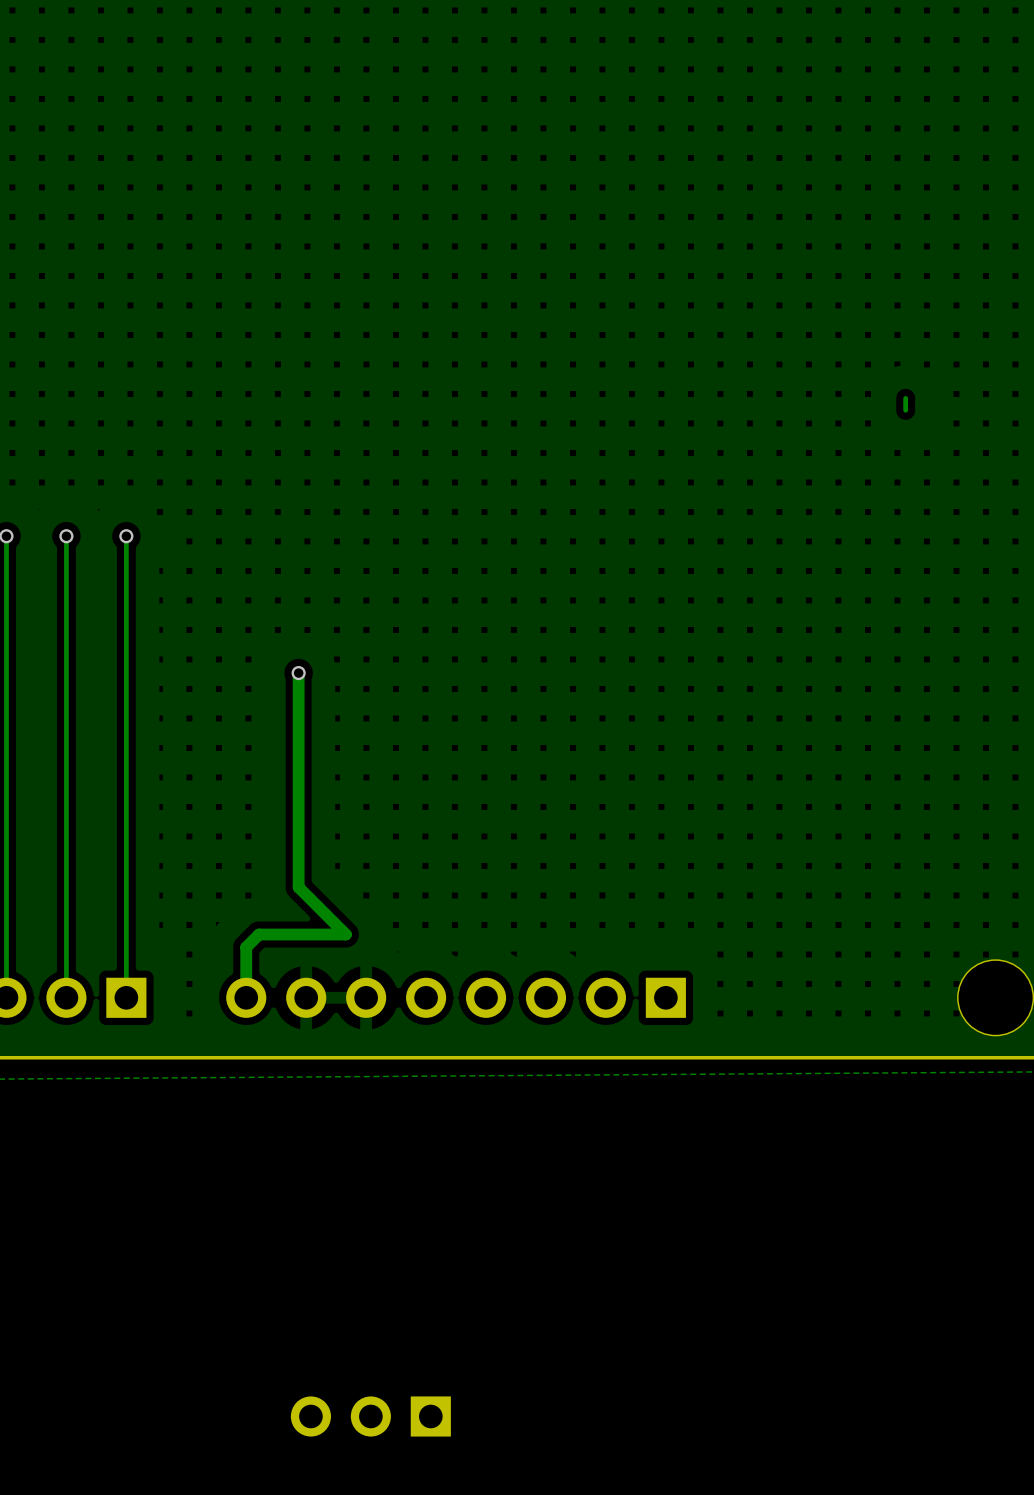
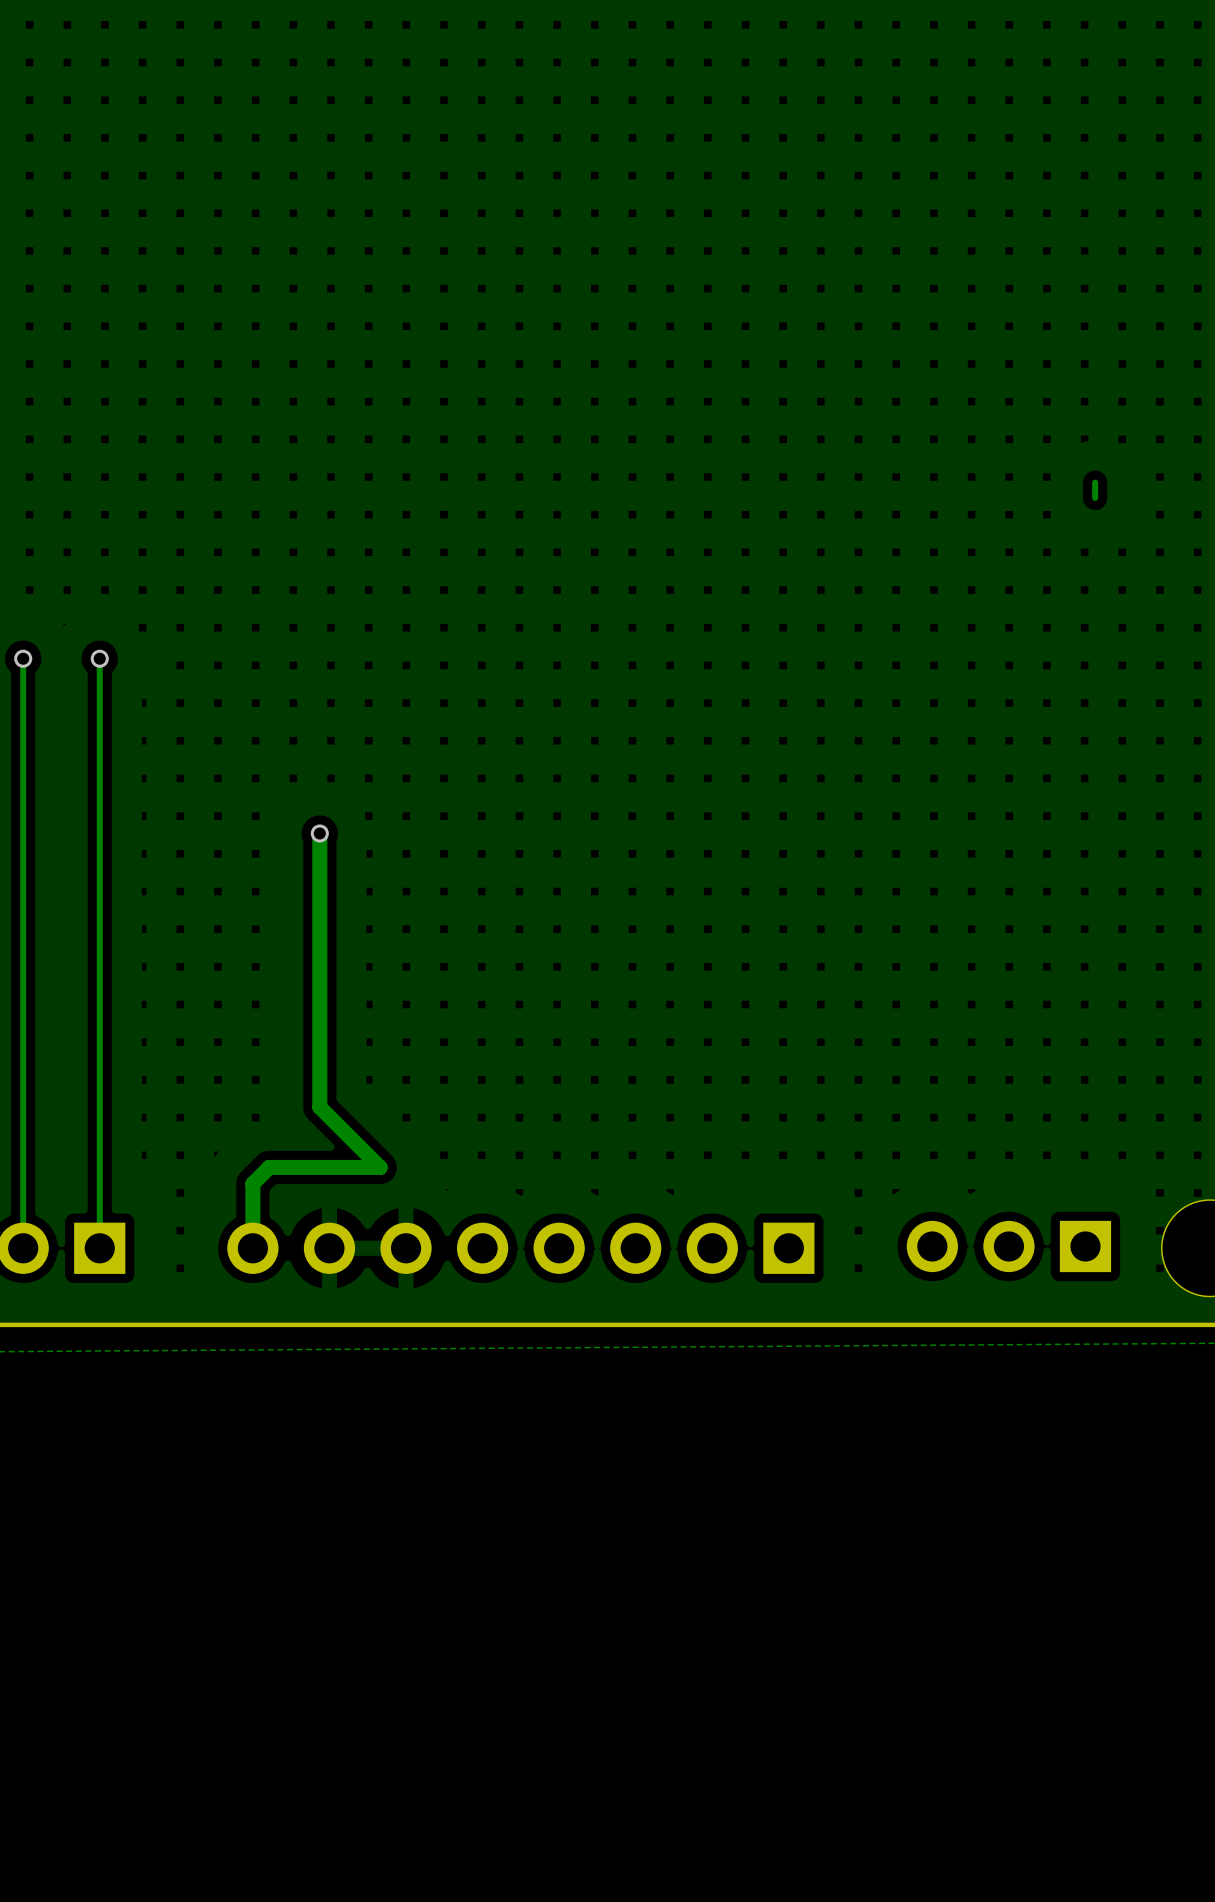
part: none -> (1008, 1246)
part: (370, 1416) -> none

